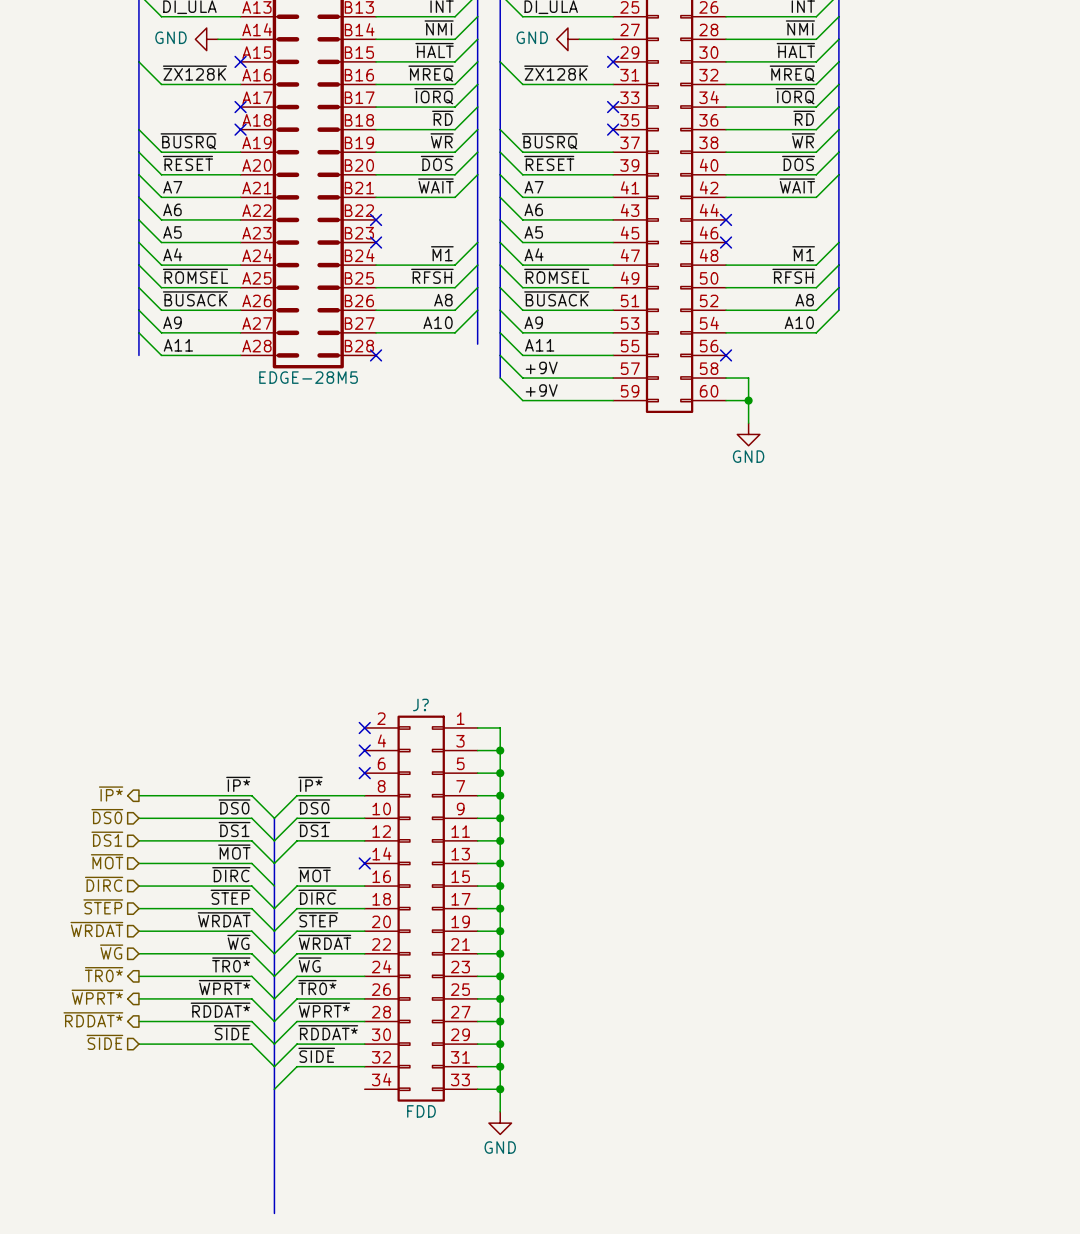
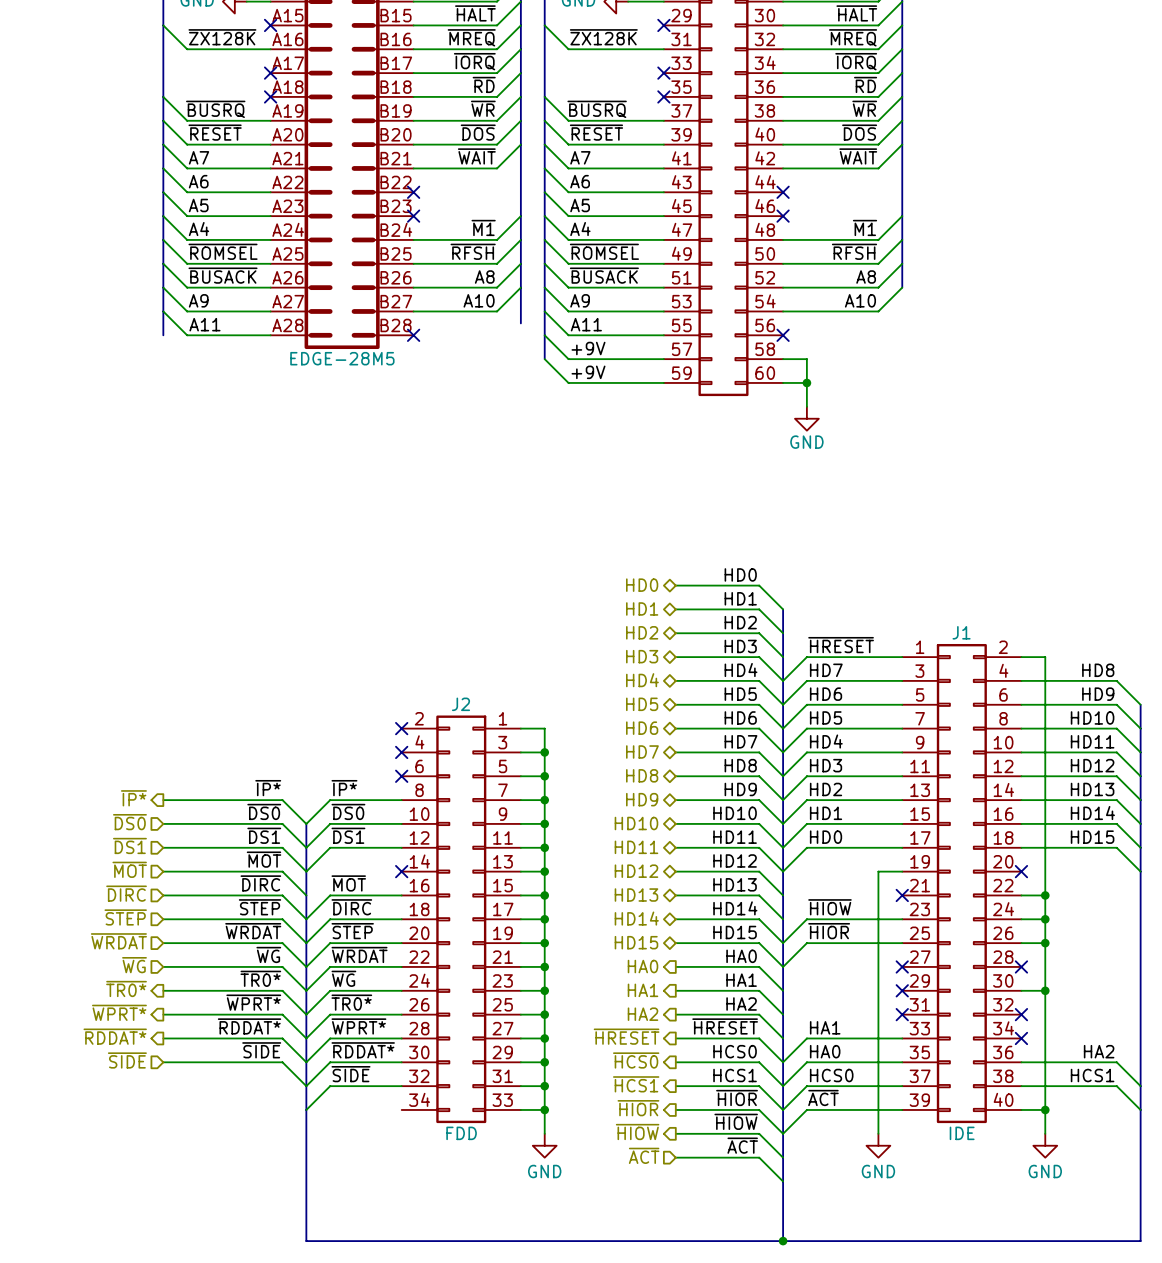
label: none -> HD0 (740, 574)
hierarchical label: none -> HD0 (642, 585)
wire: none -> (675, 585) (759, 585) (783, 609)
label: none -> HD1 (740, 598)
hierarchical label: none -> HD1 (642, 608)
wire: none -> (675, 609) (759, 609) (783, 633)
bus: none -> (783, 609) (783, 1241)
label: none -> HD2 (740, 622)
hierarchical label: none -> HD2 (642, 632)
wire: none -> (675, 633) (759, 633) (783, 657)
label: none -> ~{HRESET} (841, 645)
label: none -> HD3 (740, 646)
hierarchical label: none -> HD3 (642, 656)
wire: none -> (675, 657) (759, 657) (783, 680) (806, 657) (902, 657)
wire: none -> (1021, 657) (1045, 657) (1045, 1133)
label: none -> HD4 (740, 670)
label: none -> HD7 (826, 670)
label: none -> HD8 (1098, 670)
hierarchical label: none -> HD4 (642, 680)
wire: none -> (675, 680) (759, 680) (783, 704) (806, 680) (902, 680)
wire: none -> (1021, 680) (1116, 680) (1140, 704)
label: none -> HD5 (740, 694)
label: none -> HD6 (826, 694)
label: none -> HD9 (1098, 694)
J? name: J? (420, 704) -> J2 (461, 704)
hierarchical label: none -> HD5 (642, 704)
wire: none -> (675, 704) (759, 704) (783, 728) (806, 704) (902, 704)
wire: none -> (1021, 704) (1116, 704) (1140, 728)
bus: none -> (1140, 704) (1140, 1241) (306, 1241)
label: none -> HD6 (740, 717)
label: none -> HD5 (826, 717)
label: none -> HD10 (1092, 717)
hierarchical label: none -> HD6 (642, 728)
wire: none -> (675, 728) (759, 728) (783, 752) (806, 728) (902, 728)
wire: none -> (1021, 728) (1116, 728) (1140, 752)
label: none -> HD7 (740, 741)
label: none -> HD4 (826, 741)
label: none -> HD11 (1092, 741)
hierarchical label: none -> HD7 (642, 751)
wire: none -> (675, 752) (759, 752) (783, 776) (806, 752) (902, 752)
wire: none -> (1021, 752) (1116, 752) (1140, 776)
label: none -> HD8 (740, 765)
label: none -> HD3 (826, 765)
label: none -> HD12 (1092, 765)
hierarchical label: none -> HD8 (642, 775)
wire: none -> (675, 776) (759, 776) (783, 800) (806, 776) (902, 776)
wire: none -> (1021, 776) (1116, 776) (1140, 800)
label: none -> HD9 (740, 789)
label: none -> HD2 (826, 789)
label: none -> HD13 (1092, 789)
hierarchical label: none -> HD9 (642, 799)
wire: none -> (675, 800) (759, 800) (783, 823) (806, 800) (902, 800)
wire: none -> (1021, 800) (1116, 800) (1140, 823)
label: none -> HD14 (1092, 813)
label: none -> HD10 (735, 813)
label: none -> HD1 (826, 813)
hierarchical label: none -> HD10 (636, 823)
wire: none -> (675, 823) (759, 823) (783, 847) (806, 823) (902, 823)
wire: none -> (1021, 823) (1116, 823) (1140, 847)
label: none -> HD11 (735, 837)
label: none -> HD0 (826, 837)
label: none -> HD15 (1092, 837)
hierarchical label: none -> HD11 (636, 847)
wire: none -> (675, 847) (759, 847) (783, 871) (806, 847) (902, 847)
wire: none -> (1021, 847) (1116, 847) (1140, 871)
label: none -> HD12 (735, 860)
hierarchical label: none -> HD12 (636, 871)
wire: none -> (675, 871) (759, 871) (783, 895)
wire: none -> (902, 871) (878, 871) (878, 1133)
no-connect mark: none -> (1021, 871)
J1: none -> IDE (961, 883)
label: none -> HD13 (735, 884)
hierarchical label: none -> HD13 (636, 895)
wire: none -> (675, 895) (759, 895) (783, 919)
no-connect mark: none -> (902, 895)
wire: none -> (1021, 895) (1045, 895)
junction: none -> (1045, 895)
label: none -> ~{HIOW} (829, 907)
label: none -> HD14 (735, 908)
hierarchical label: none -> HD14 (636, 918)
wire: none -> (675, 919) (759, 919) (783, 943) (806, 919) (902, 919)
wire: none -> (1021, 919) (1045, 919)
junction: none -> (1045, 919)
label: none -> ~{HIOR} (829, 931)
label: none -> HD15 (735, 932)
hierarchical label: none -> HD15 (636, 942)
wire: none -> (675, 943) (759, 943) (783, 966) (806, 943) (902, 943)
wire: none -> (1021, 943) (1045, 943)
junction: none -> (1045, 943)
label: none -> HA0 (741, 956)
hierarchical label: none -> HA0 (643, 966)
wire: none -> (675, 966) (759, 966) (783, 990)
no-connect mark: none -> (902, 966)
no-connect mark: none -> (1021, 966)
label: none -> HA1 (741, 980)
hierarchical label: none -> HA1 (643, 990)
wire: none -> (675, 990) (759, 990) (783, 1014)
no-connect mark: none -> (902, 990)
wire: none -> (1021, 990) (1045, 990)
junction: none -> (1045, 990)
label: none -> HA2 (741, 1004)
hierarchical label: none -> HA2 (643, 1014)
wire: none -> (675, 1014) (759, 1014) (783, 1038)
no-connect mark: none -> (902, 1014)
no-connect mark: none -> (1021, 1014)
label: none -> ~{HRESET} (725, 1026)
label: none -> HA1 (825, 1027)
hierarchical label: none -> ~{HRESET} (626, 1036)
wire: none -> (675, 1038) (759, 1038) (783, 1062) (806, 1038) (902, 1038)
no-connect mark: none -> (1021, 1038)
label: none -> HCS0 (735, 1051)
label: none -> HA0 (825, 1051)
label: none -> HA2 (1099, 1051)
hierarchical label: none -> ~{HCS0} (636, 1060)
wire: none -> (675, 1062) (759, 1062) (783, 1086) (806, 1062) (902, 1062)
wire: none -> (1021, 1062) (1116, 1062) (1140, 1086)
label: none -> HCS1 (735, 1075)
label: none -> HCS0 (831, 1075)
label: none -> HCS1 (1092, 1075)
hierarchical label: none -> ~{HCS1} (636, 1084)
wire: none -> (675, 1086) (759, 1086) (783, 1109) (806, 1086) (902, 1086)
wire: none -> (1021, 1086) (1116, 1086) (1140, 1109)
label: none -> ~{HIOR} (737, 1097)
label: none -> ~{ACT} (823, 1097)
hierarchical label: none -> ~{HIOR} (638, 1108)
wire: none -> (675, 1109) (759, 1109) (783, 1133) (806, 1109) (902, 1109)
wire: none -> (1021, 1109) (1045, 1109)
junction: none -> (1045, 1109)
label: none -> ~{HIOW} (736, 1121)
hierarchical label: none -> ~{HIOW} (637, 1132)
wire: none -> (675, 1133) (759, 1133) (783, 1157)
label: none -> ~{ACT} (742, 1145)
power symbol: none -> GND (878, 1145)
power symbol: none -> GND (1045, 1145)
hierarchical label: none -> ~{ACT} (644, 1155)
wire: none -> (675, 1157) (759, 1157) (783, 1181)
junction: none -> (783, 1241)

